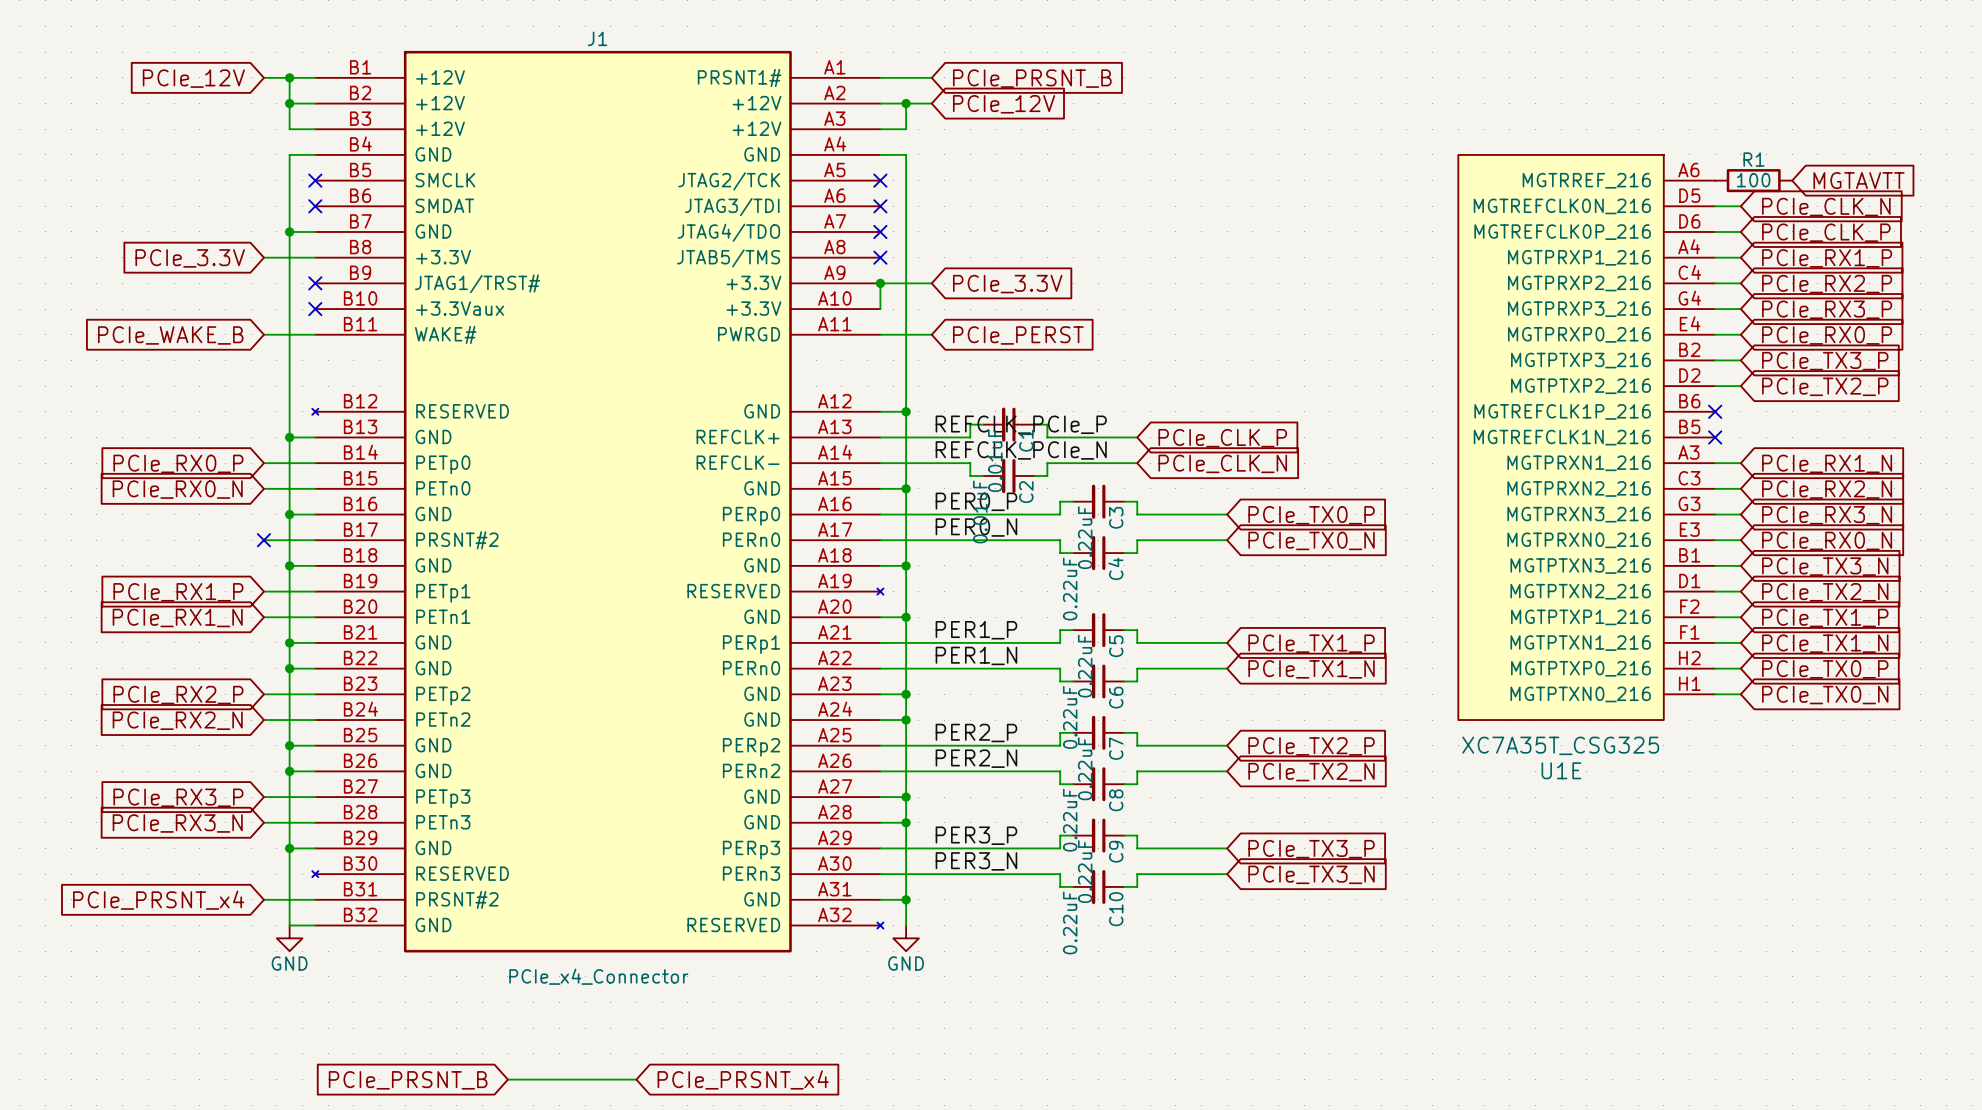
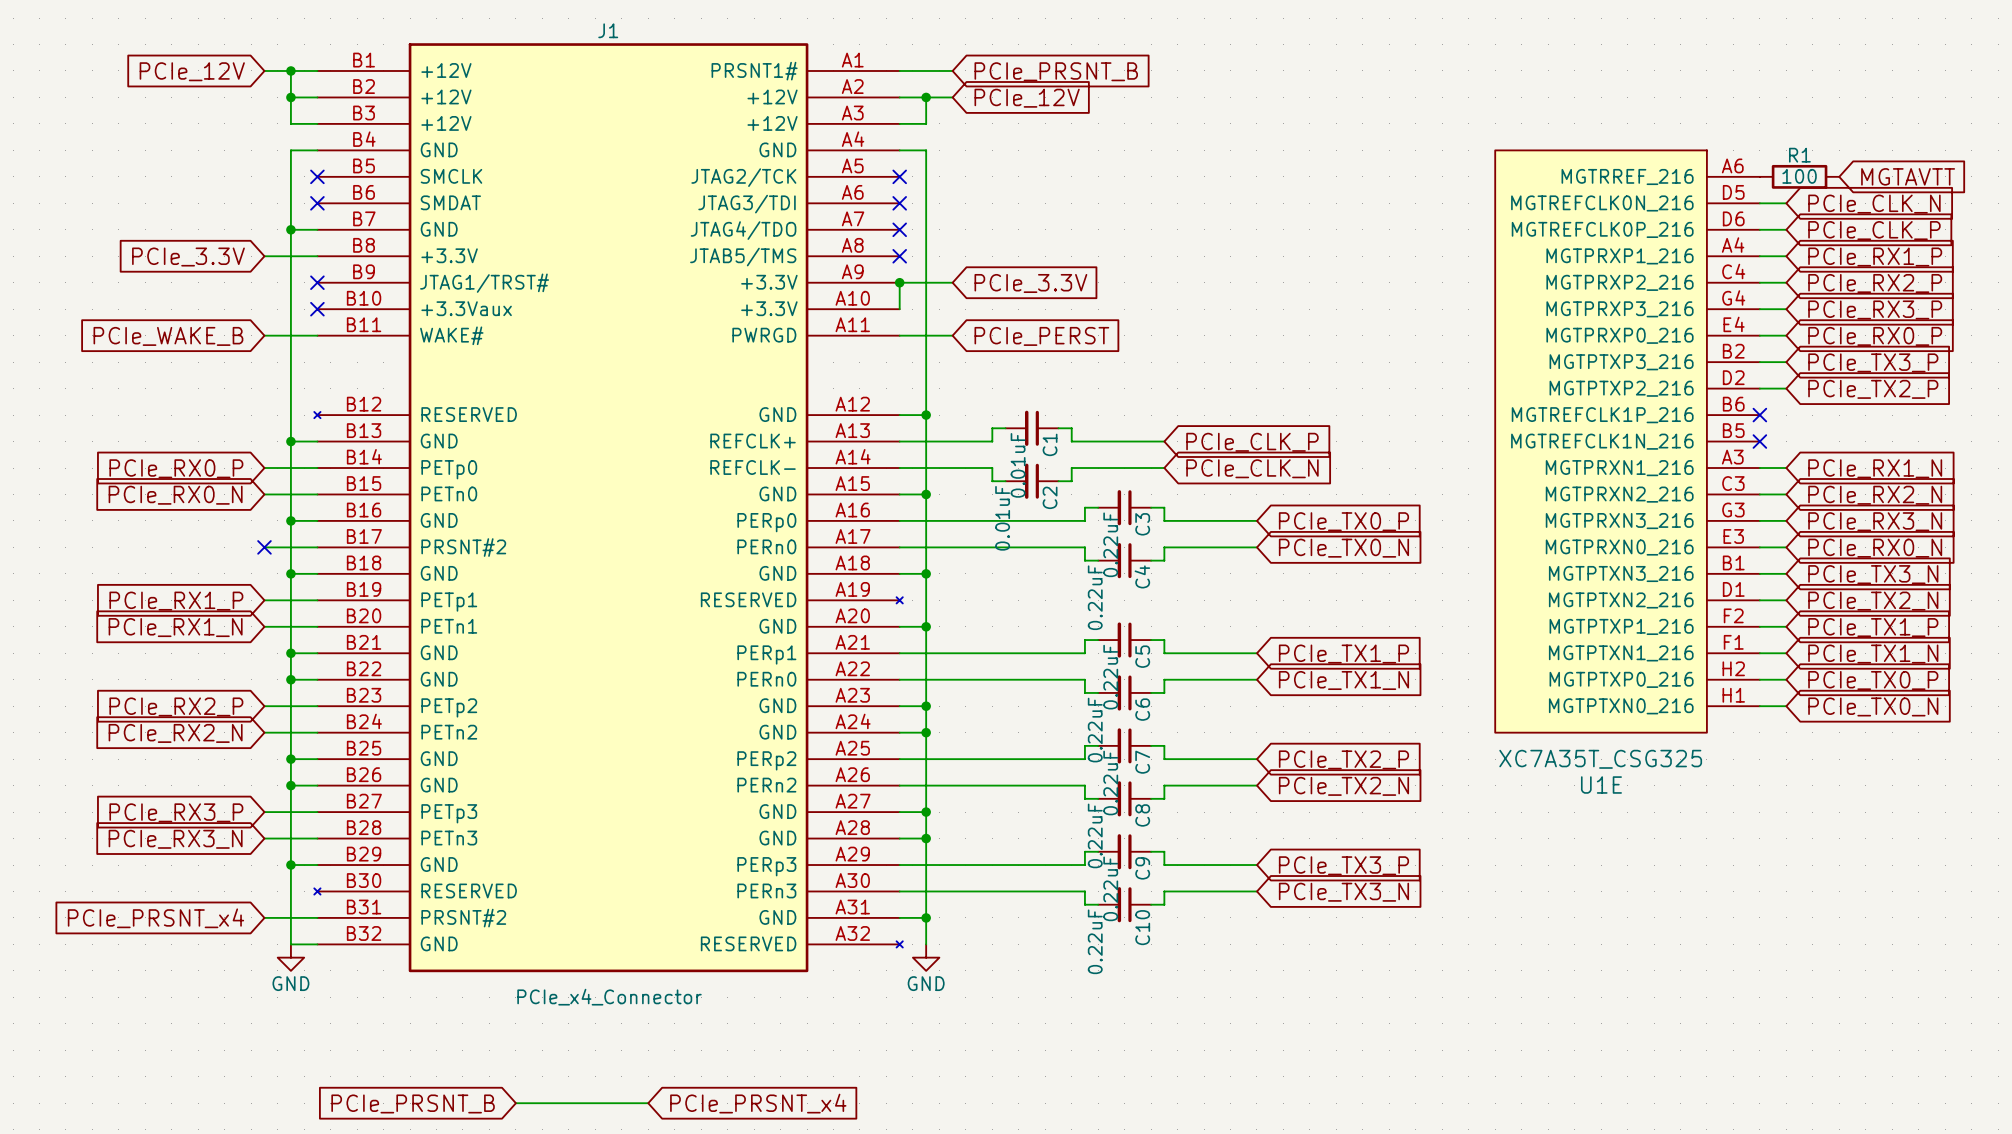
label: REFCLK_PCIe_P (1021, 424) -> none
label: REFCLK_PCIe_N (1021, 450) -> none
label: PER0_P (976, 501) -> none
label: PER0_N (976, 527) -> none
label: PER1_P (976, 630) -> none
label: PER1_N (976, 655) -> none
label: PER2_P (976, 732) -> none
label: PER2_N (976, 758) -> none
label: PER3_P (976, 835) -> none
label: PER3_N (976, 861) -> none

